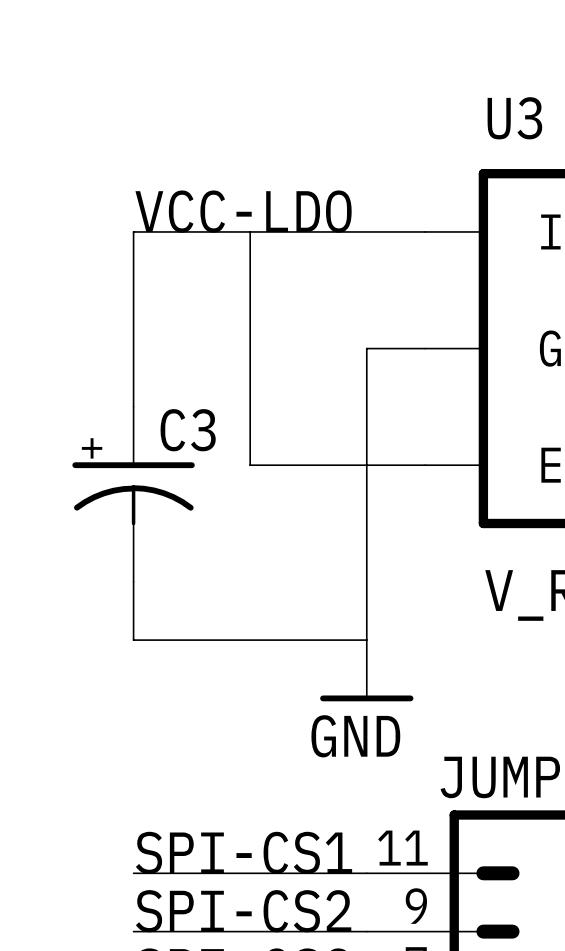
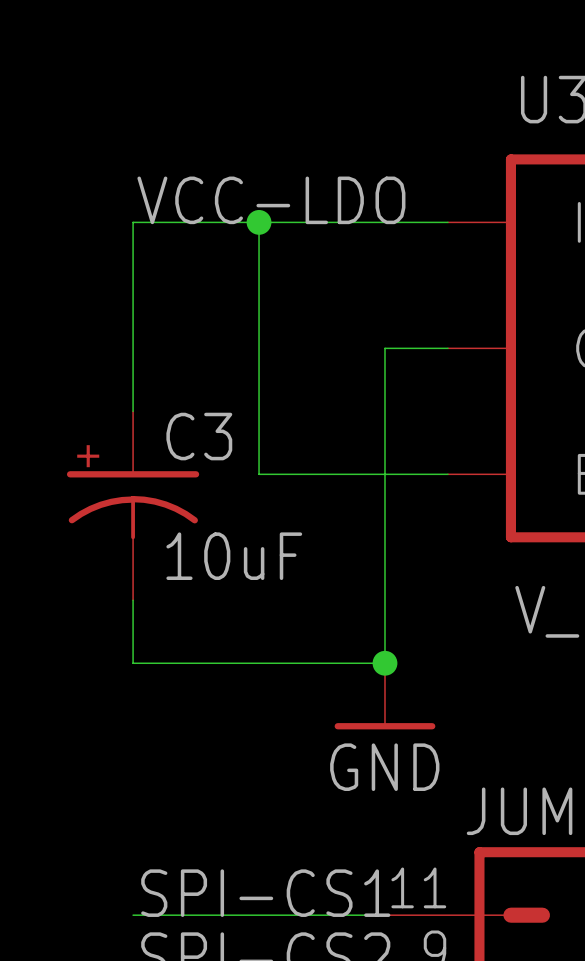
junction: none -> (259, 222)
C3 value: none -> 10uF (234, 556)
junction: none -> (384, 663)

